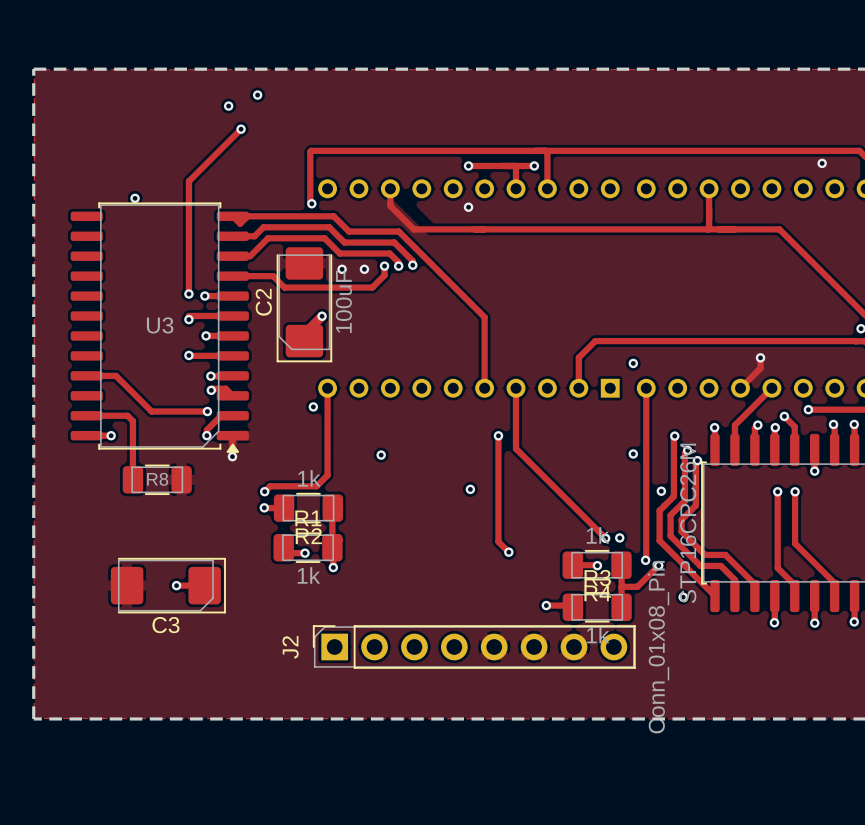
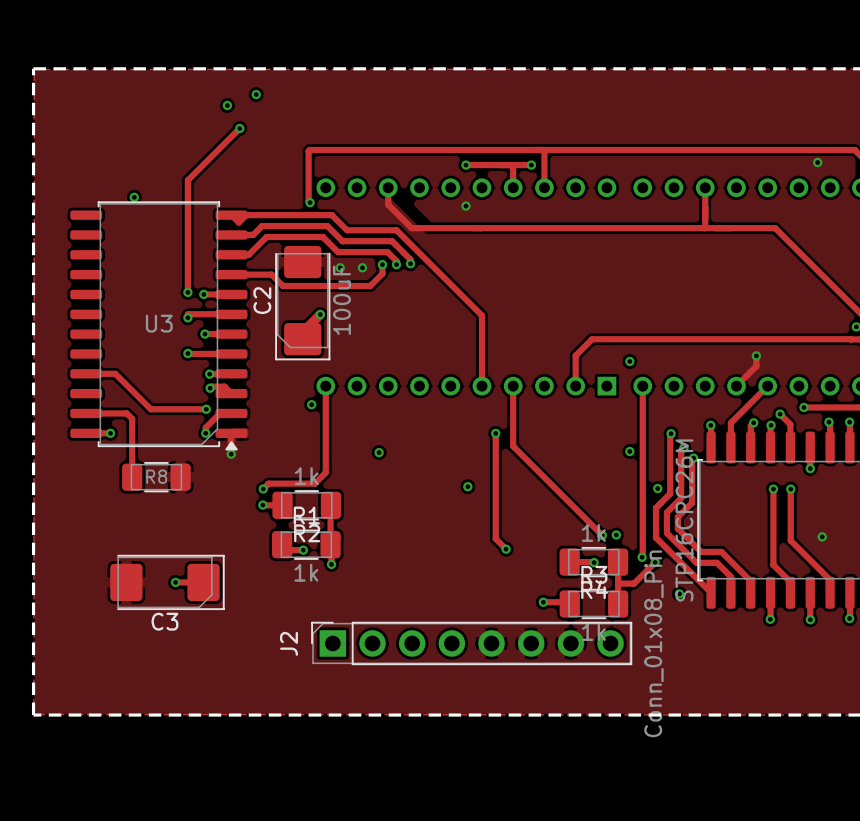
via: none -> (822, 536)

